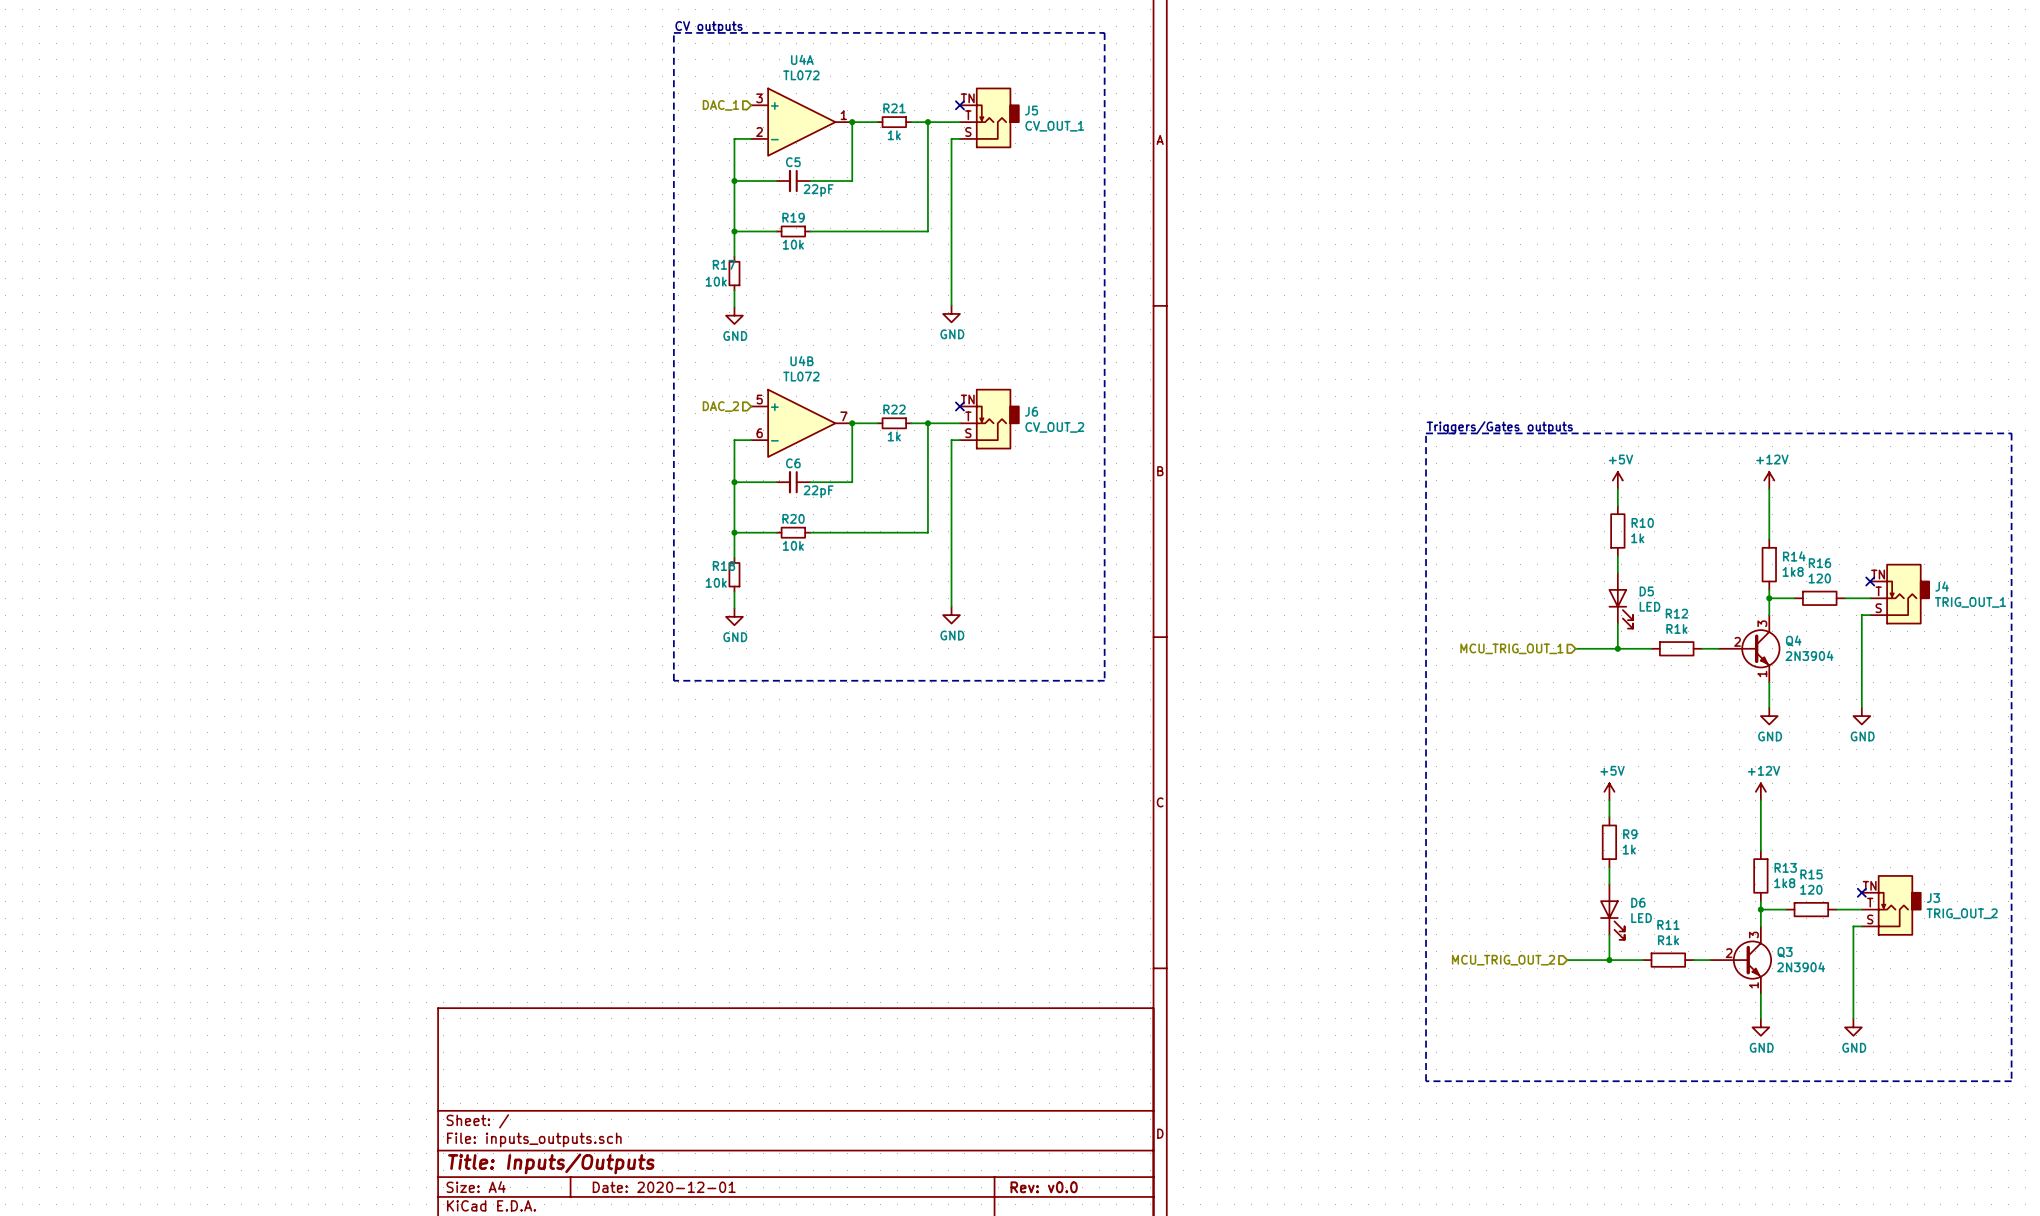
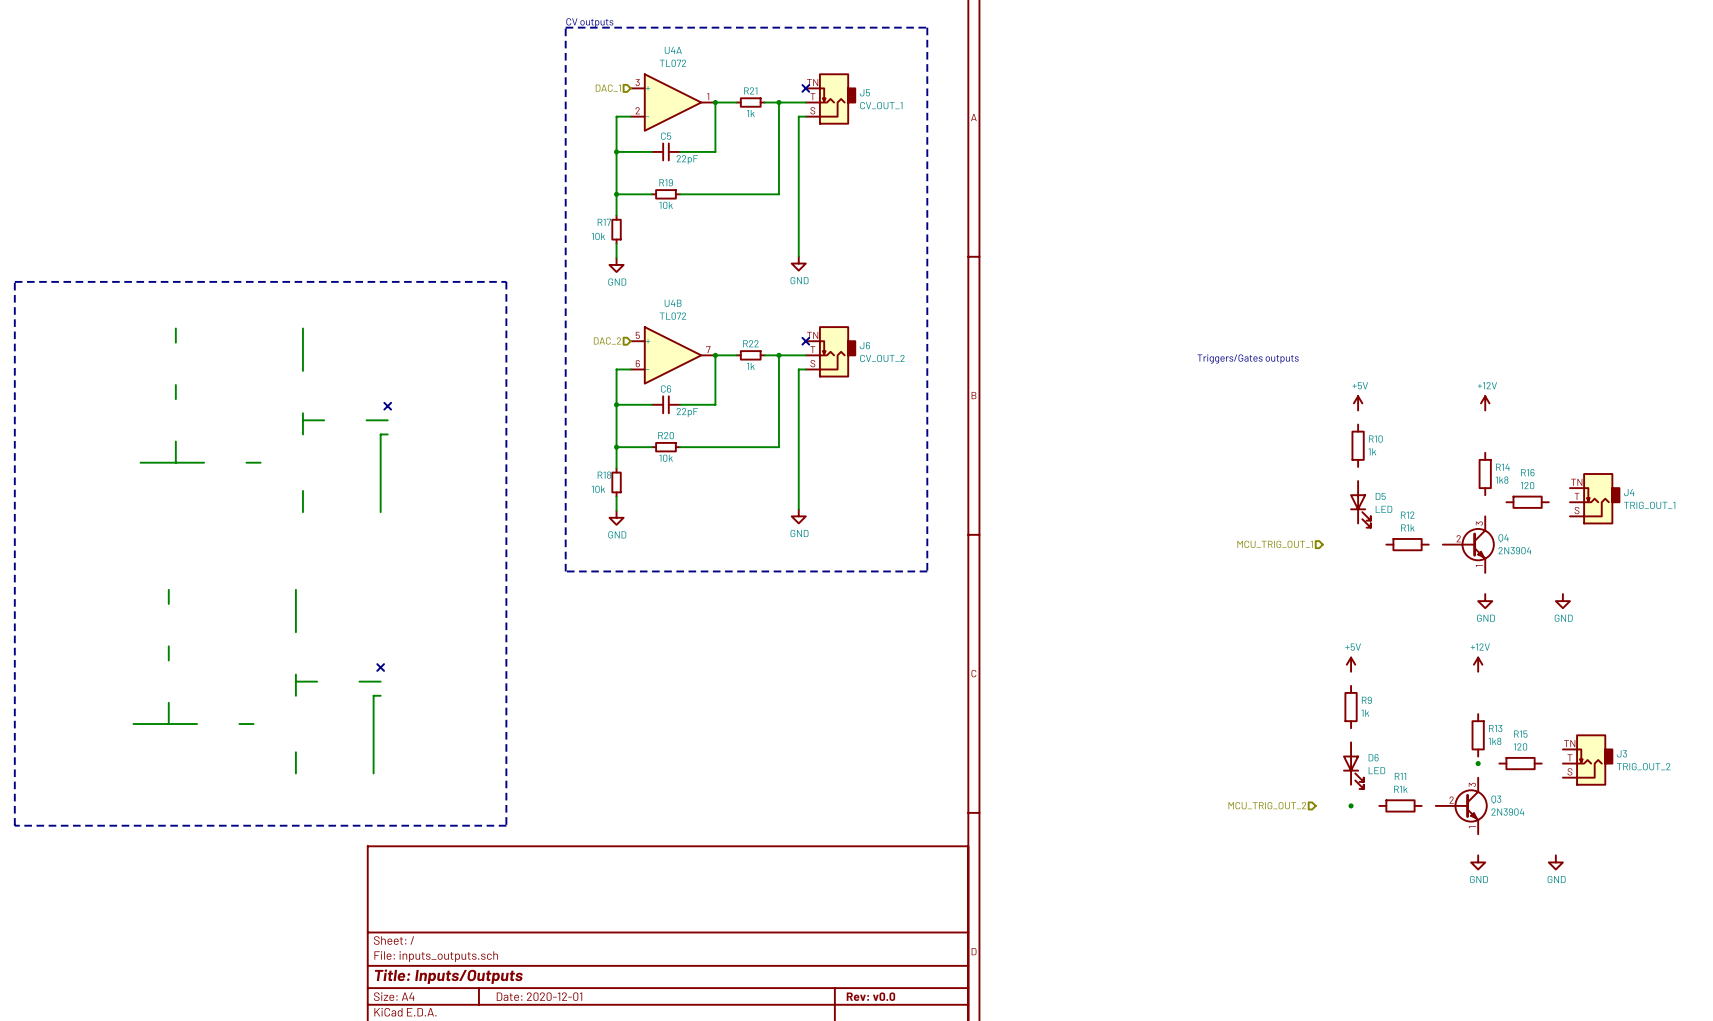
line: none -> (14, 281) (506, 281) (506, 825) (14, 825) (14, 281)
wire: none -> (175, 328) (175, 342)
wire: none -> (302, 328) (302, 370)
line: (1426, 433) (2011, 433) (2011, 1081) (1426, 1081) (1426, 433) -> none
wire: none -> (175, 385) (175, 399)
no-connect mark: none -> (387, 406)
wire: (1617, 488) (1617, 505) -> none
wire: (1769, 488) (1769, 539) -> none
wire: none -> (302, 413) (302, 434)
wire: none -> (302, 420) (324, 420)
wire: none -> (366, 420) (387, 420)
wire: none -> (387, 434) (380, 434) (380, 512)
wire: none -> (175, 441) (175, 462)
wire: none -> (140, 462) (204, 462)
wire: none -> (246, 462) (260, 462)
wire: (1617, 556) (1617, 573) -> none
no-connect mark: (1870, 581) -> none
wire: none -> (302, 490) (302, 512)
wire: (1769, 589) (1769, 615) -> none
wire: (1769, 598) (1794, 598) -> none
junction: (1769, 598) -> none
wire: (1845, 598) (1870, 598) -> none
wire: (1870, 615) (1861, 615) (1861, 707) -> none
wire: (1617, 623) (1617, 648) -> none
wire: (1575, 648) (1651, 648) -> none
junction: (1617, 648) -> none
wire: (1701, 648) (1718, 648) -> none
wire: (1769, 682) (1769, 707) -> none
wire: none -> (168, 589) (168, 603)
wire: none -> (295, 589) (295, 632)
wire: none -> (168, 646) (168, 660)
no-connect mark: none -> (380, 667)
wire: (1609, 800) (1609, 817) -> none
wire: (1760, 800) (1760, 850) -> none
wire: none -> (295, 674) (295, 695)
wire: none -> (295, 681) (317, 681)
wire: none -> (359, 681) (380, 681)
wire: none -> (380, 695) (373, 695) (373, 773)
wire: none -> (168, 702) (168, 724)
wire: none -> (133, 724) (197, 724)
wire: none -> (239, 724) (253, 724)
wire: (1609, 867) (1609, 884) -> none
no-connect mark: (1861, 892) -> none
wire: none -> (295, 752) (295, 773)
wire: (1760, 901) (1760, 926) -> none
wire: (1760, 909) (1786, 909) -> none
wire: (1836, 909) (1861, 909) -> none
wire: (1861, 926) (1853, 926) (1853, 1018) -> none
wire: (1609, 934) (1609, 960) -> none
wire: (1567, 960) (1643, 960) -> none
wire: (1693, 960) (1710, 960) -> none
wire: (1760, 993) (1760, 1018) -> none

